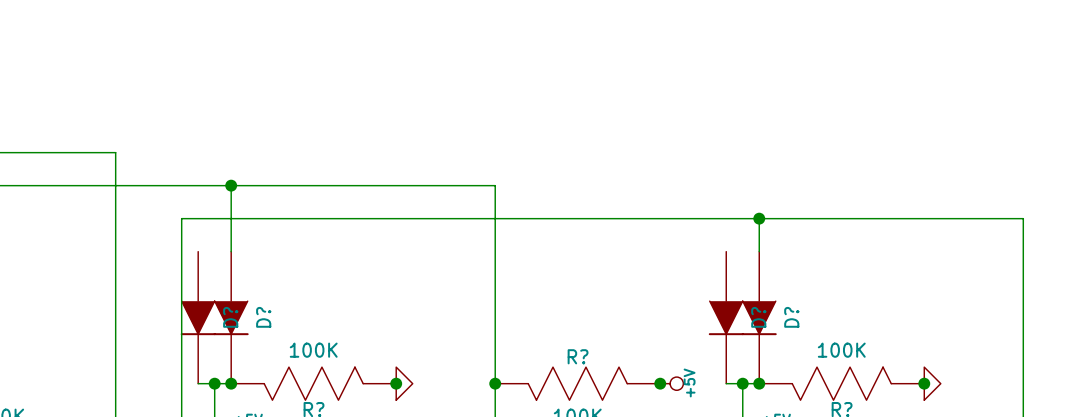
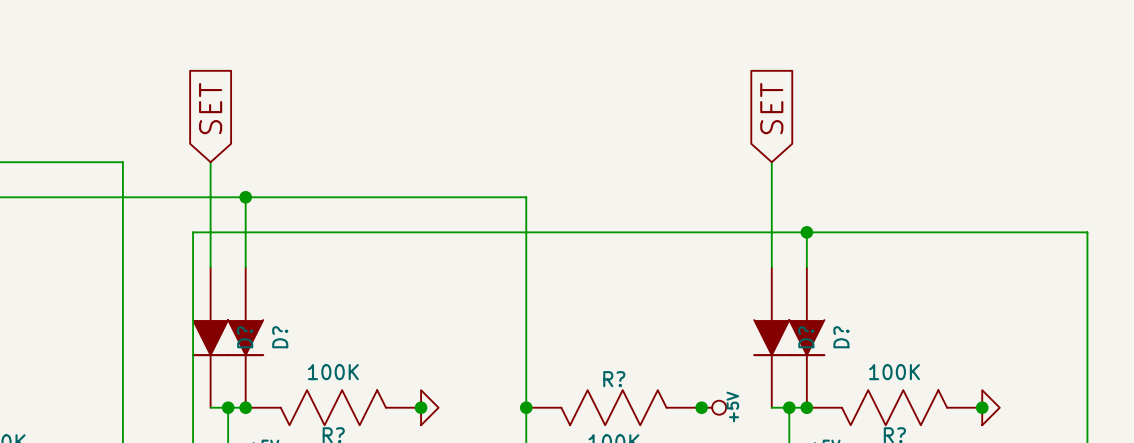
global label: none -> SET (210, 108)
global label: none -> SET (771, 108)
wire: none -> (210, 162) (210, 267)
wire: none -> (771, 162) (771, 267)

